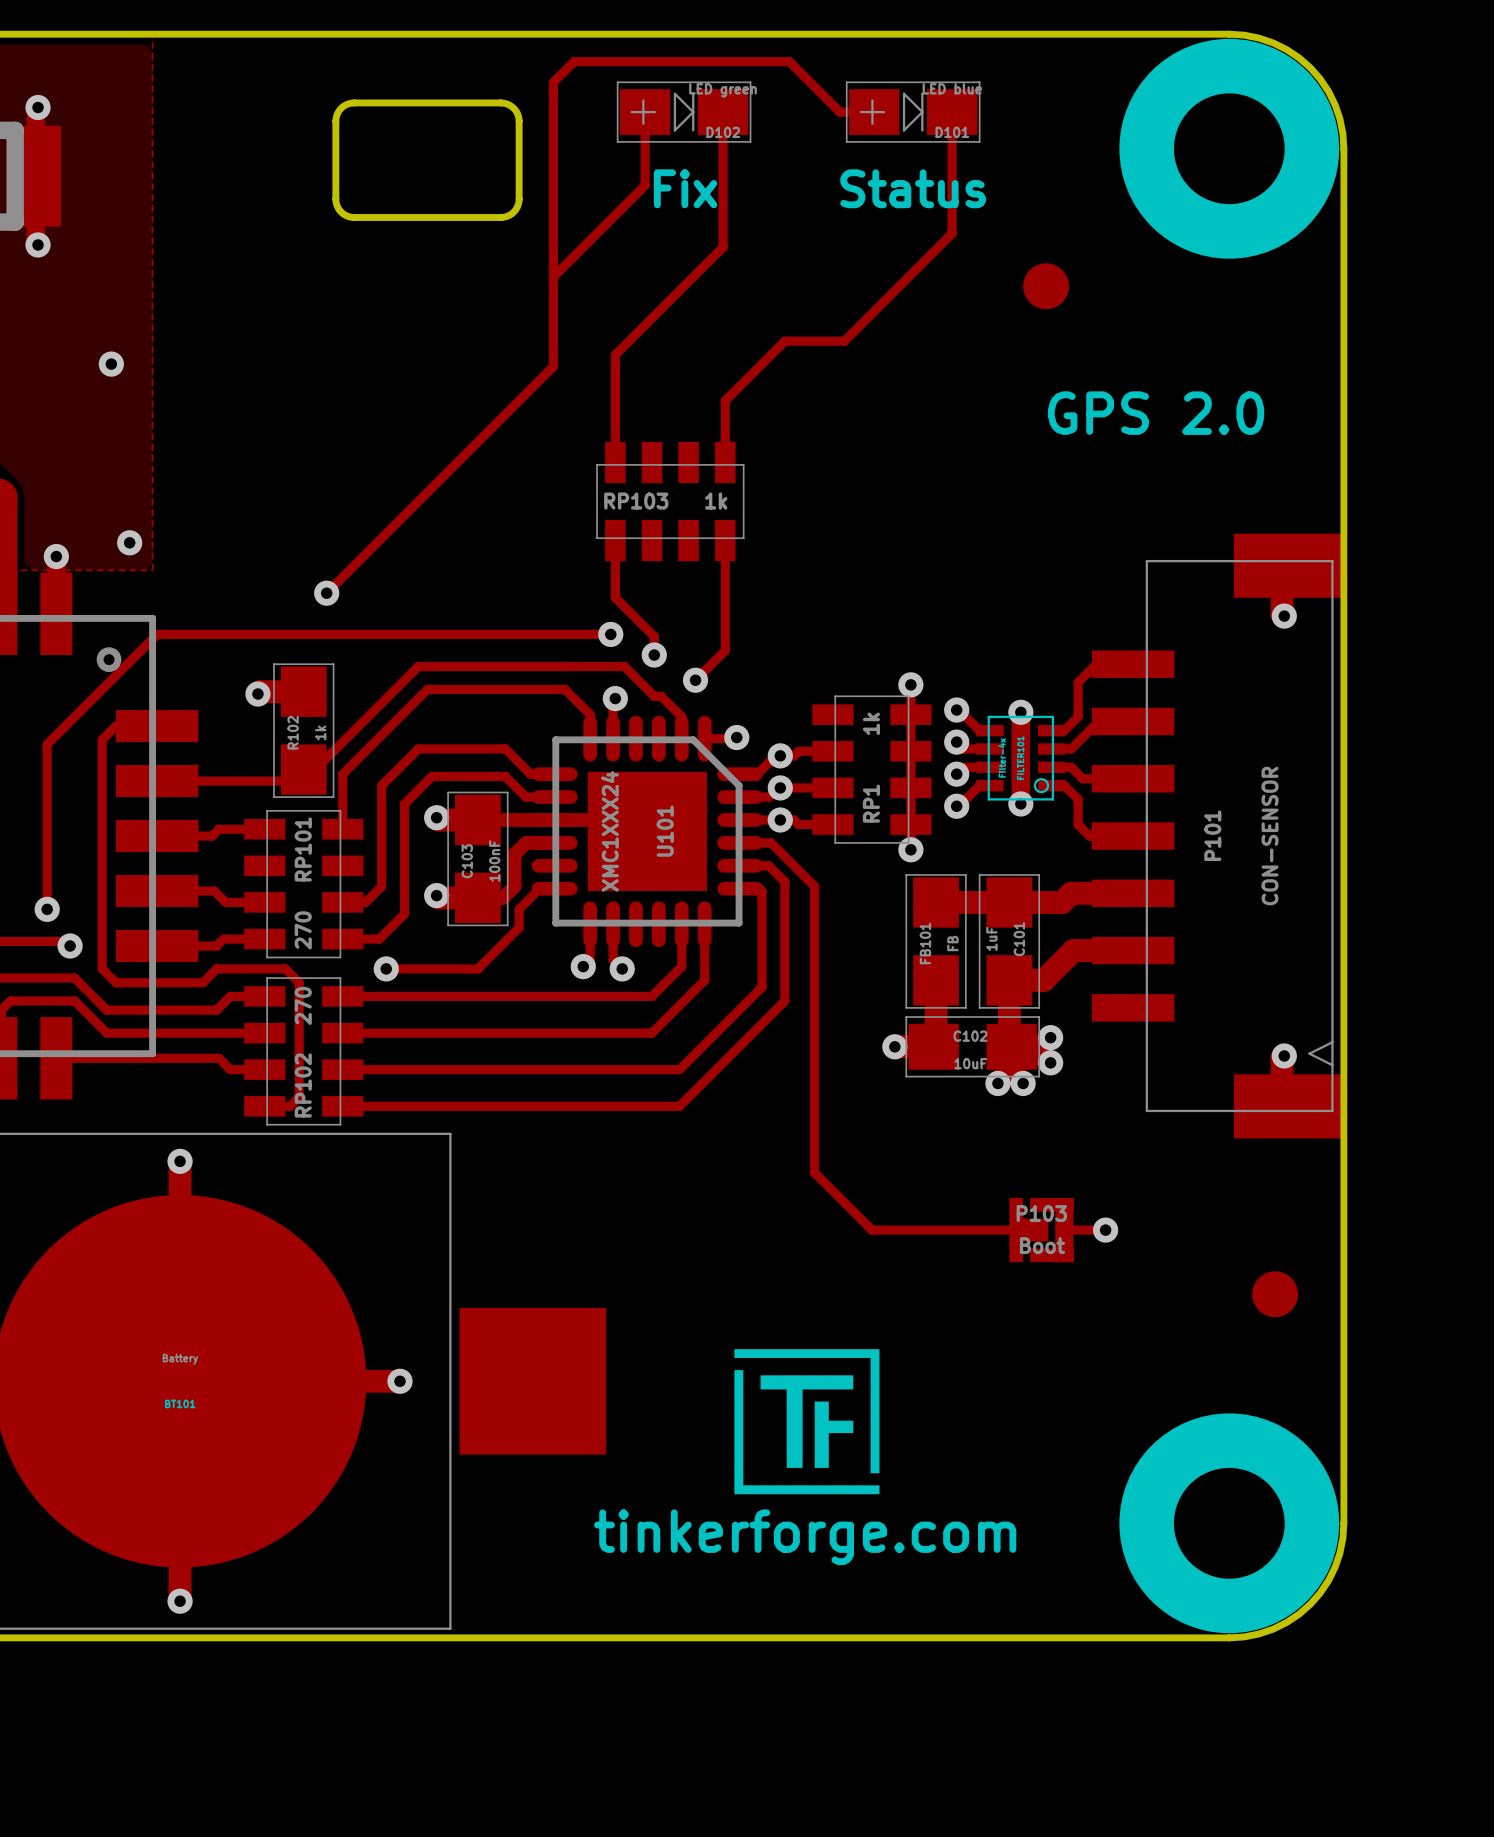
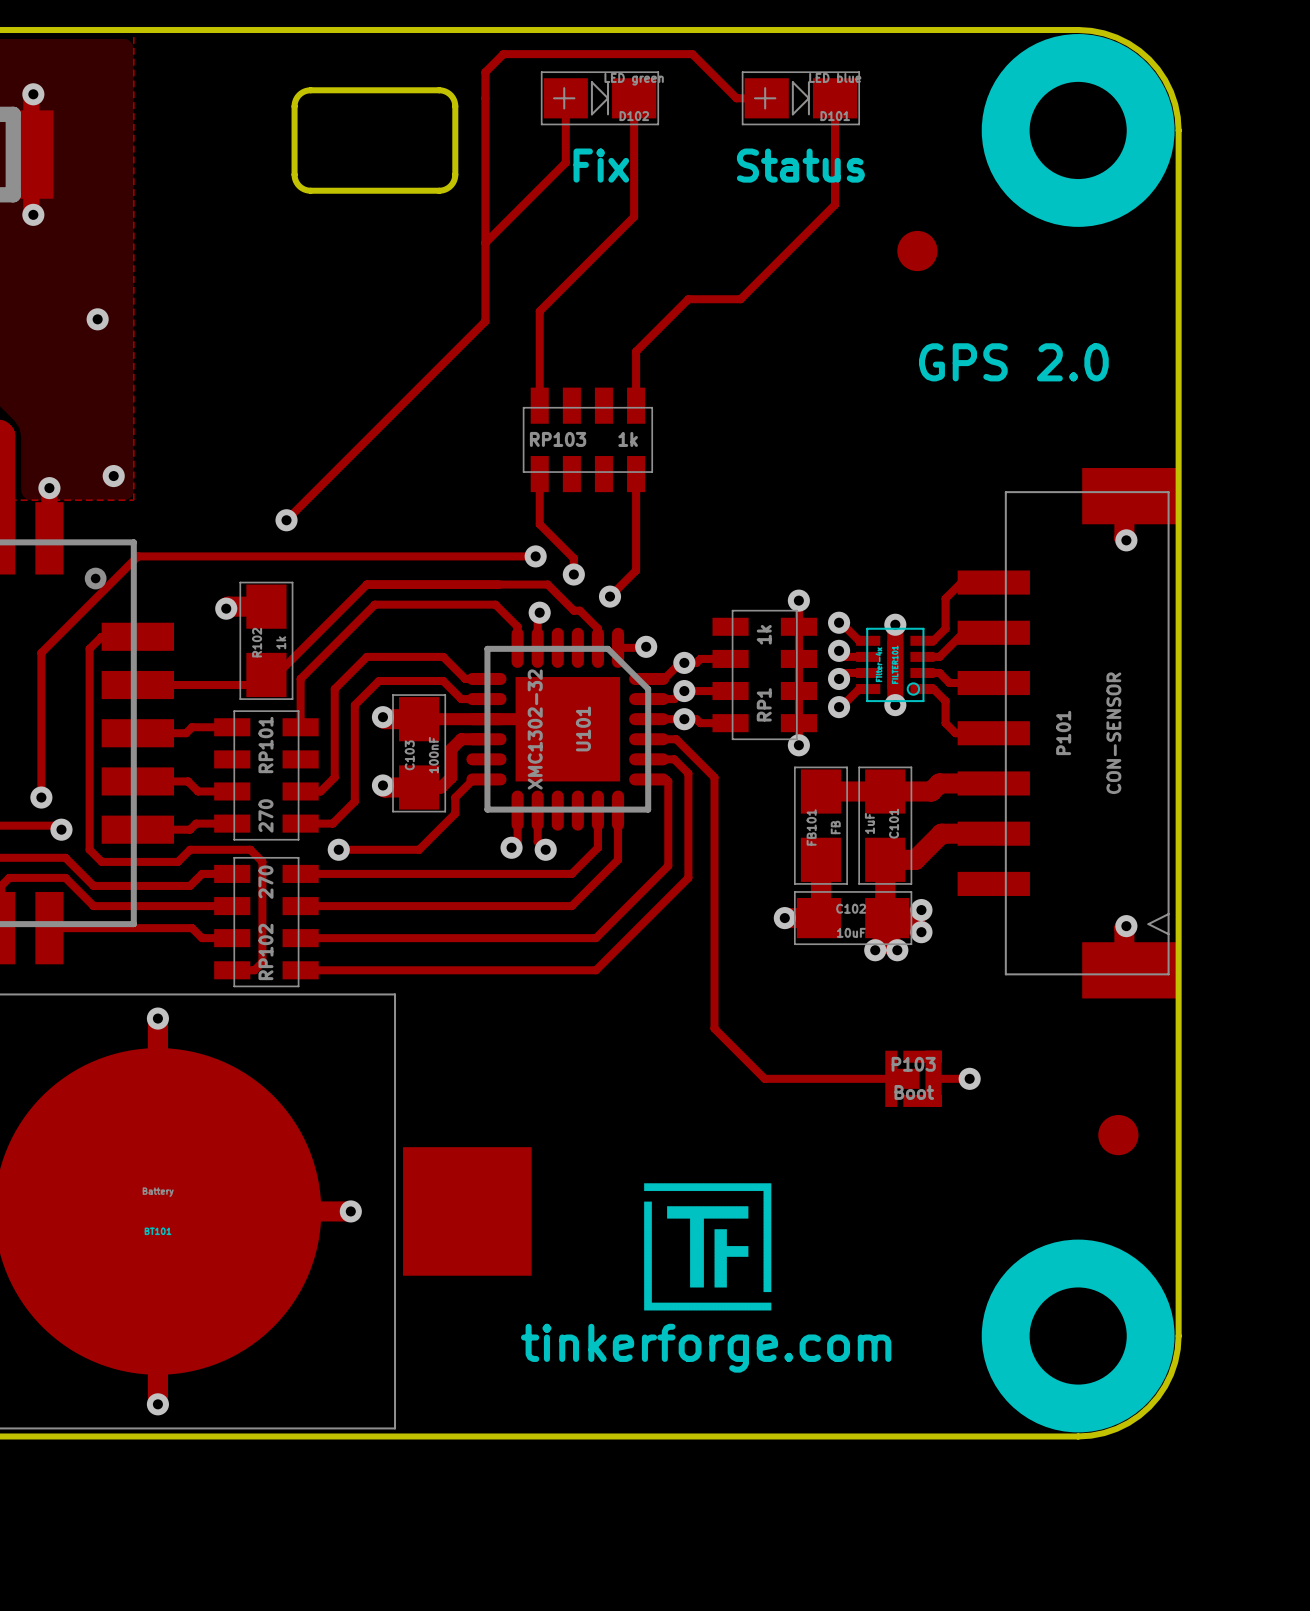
U101 value: XMC1XXX24 (609, 831) -> XMC1302-32 (535, 729)

